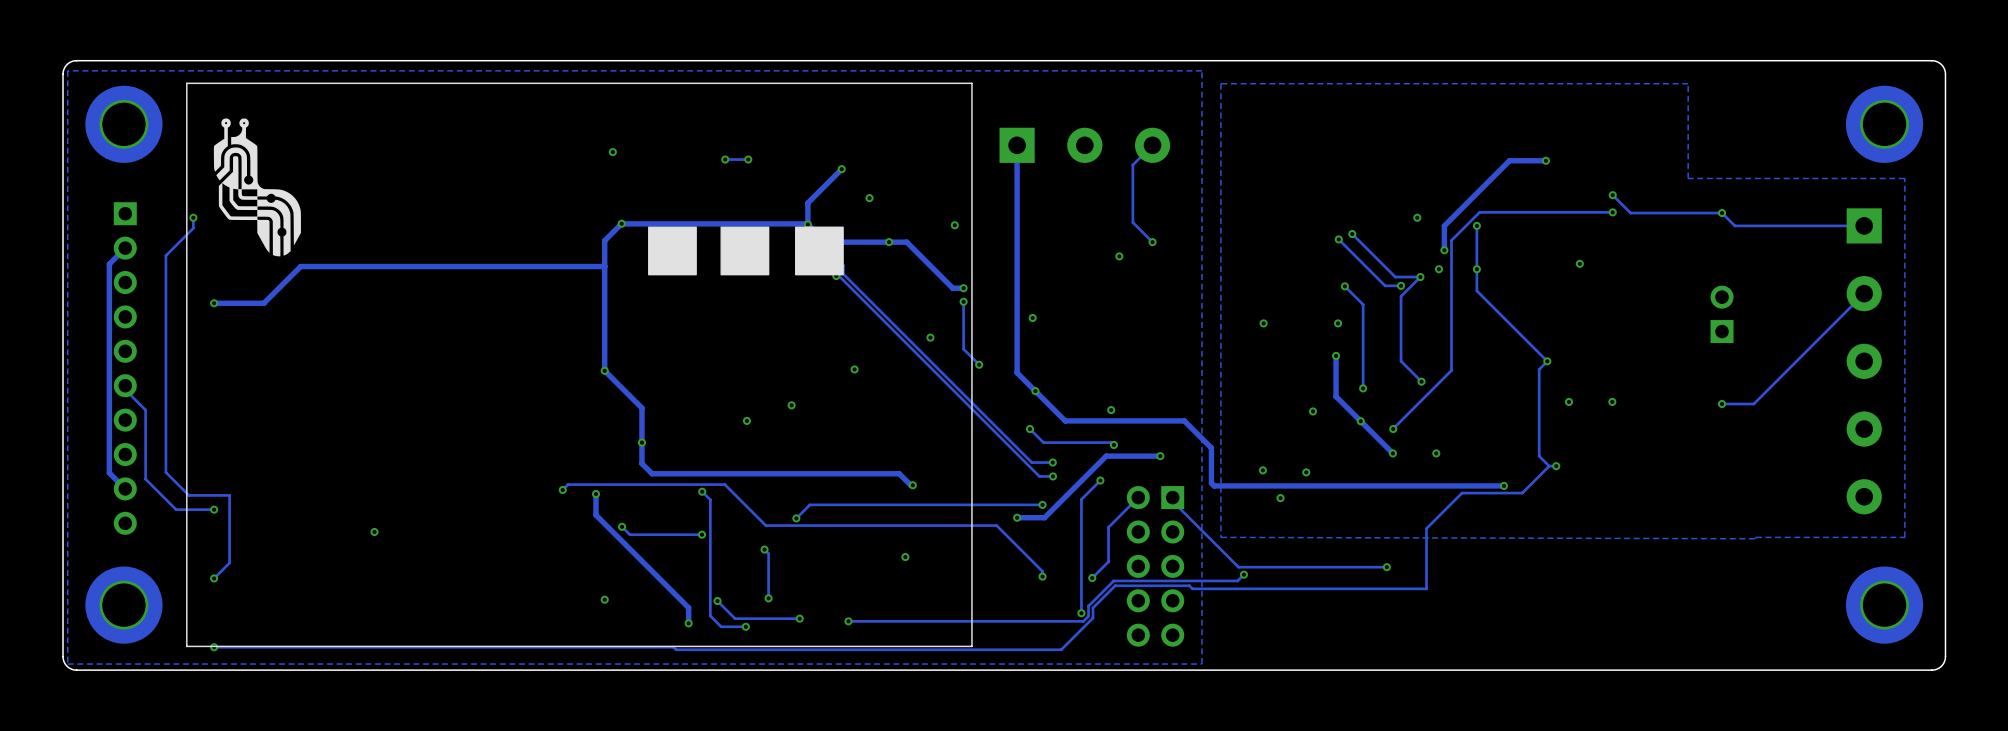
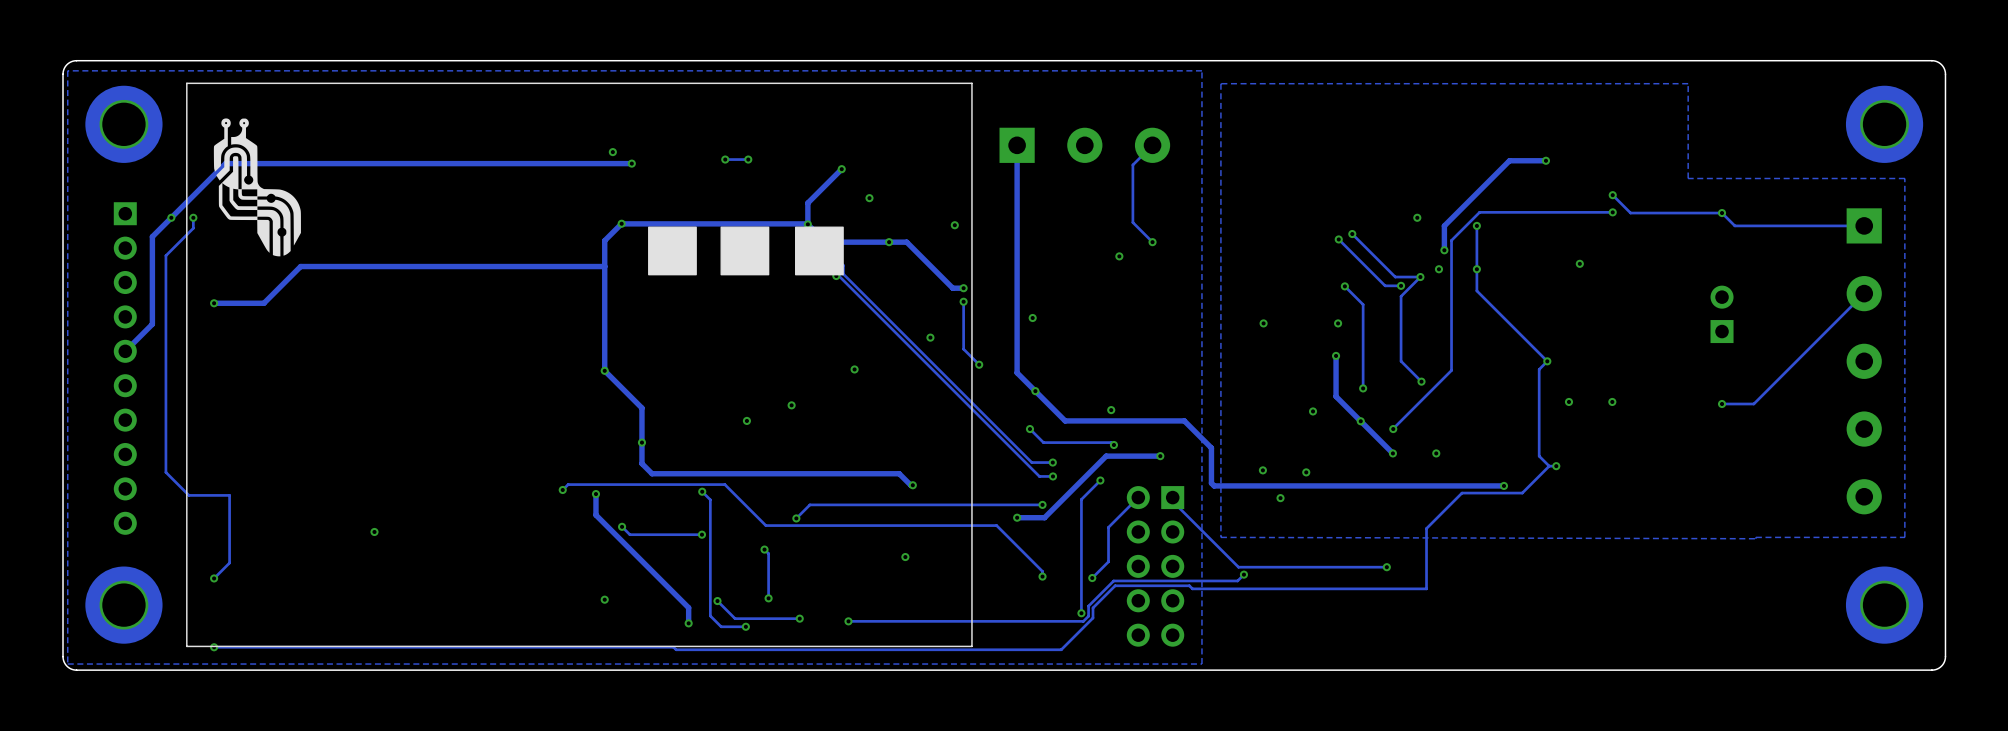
track: none -> (631, 163) (225, 163) (152, 236) (152, 324) (125, 351)
via: none -> (631, 163)
via: none -> (171, 217)
track: (125, 248) (109, 264) (109, 472) (125, 488) -> none
track: (125, 385) (125, 389) (145, 410) (145, 479) (176, 509) (214, 509) -> none
via: (214, 509) -> none

